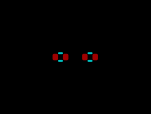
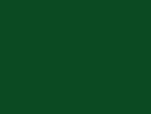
part: (60, 57) -> none
part: (90, 57) -> none

